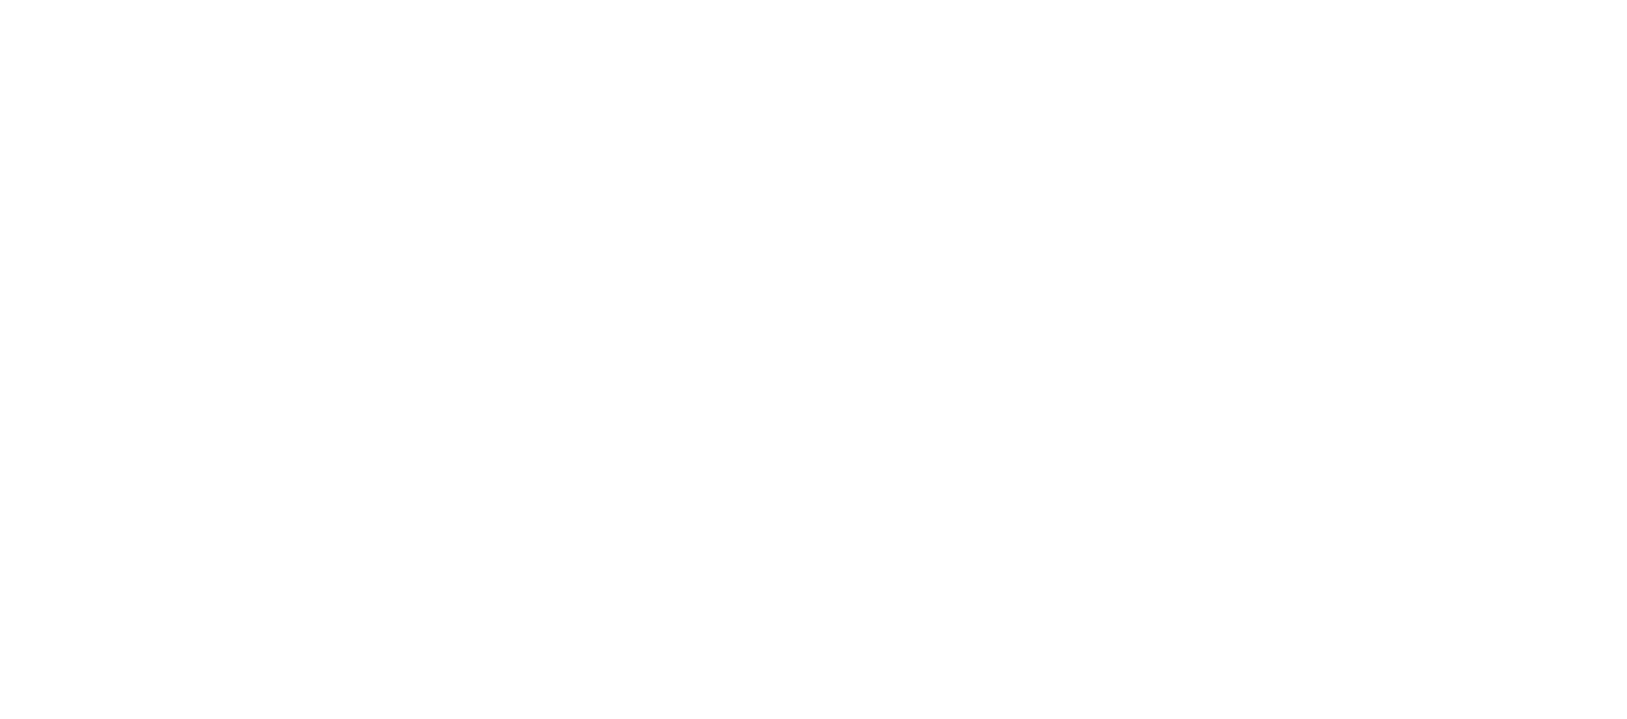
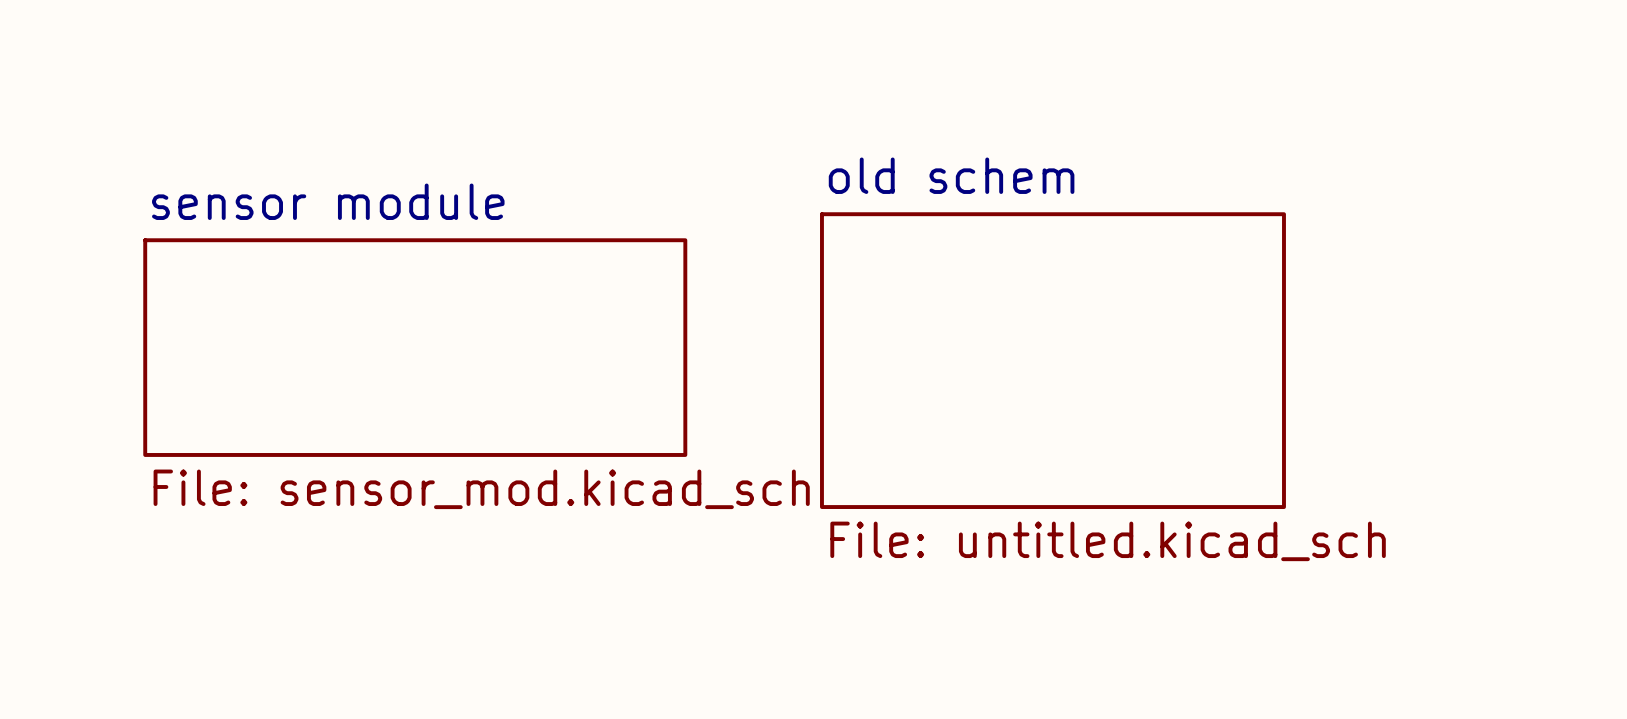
sheet sensor module: none -> File: sensor_mod.kicad_sch (415, 347)
sheet old schem: none -> File: untitled.kicad_sch (1052, 360)

